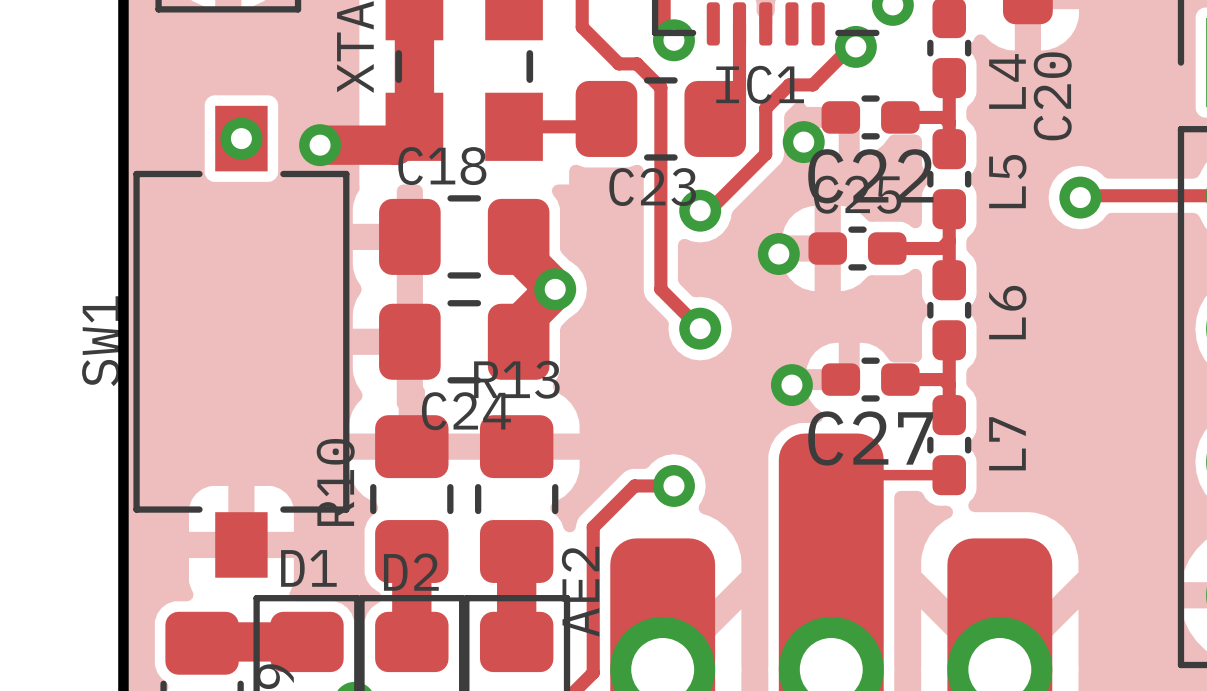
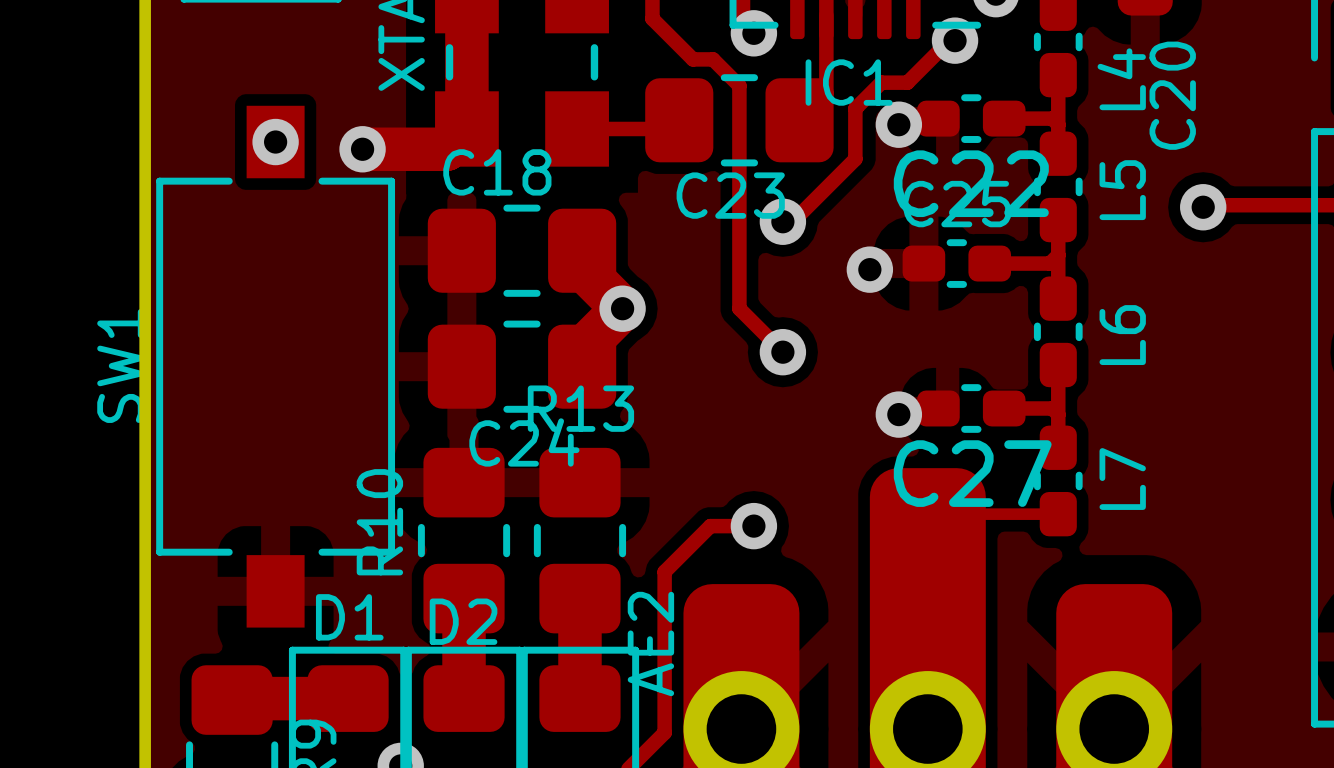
via position: (803, 142) -> (898, 124)
via position: (791, 385) -> (898, 414)

